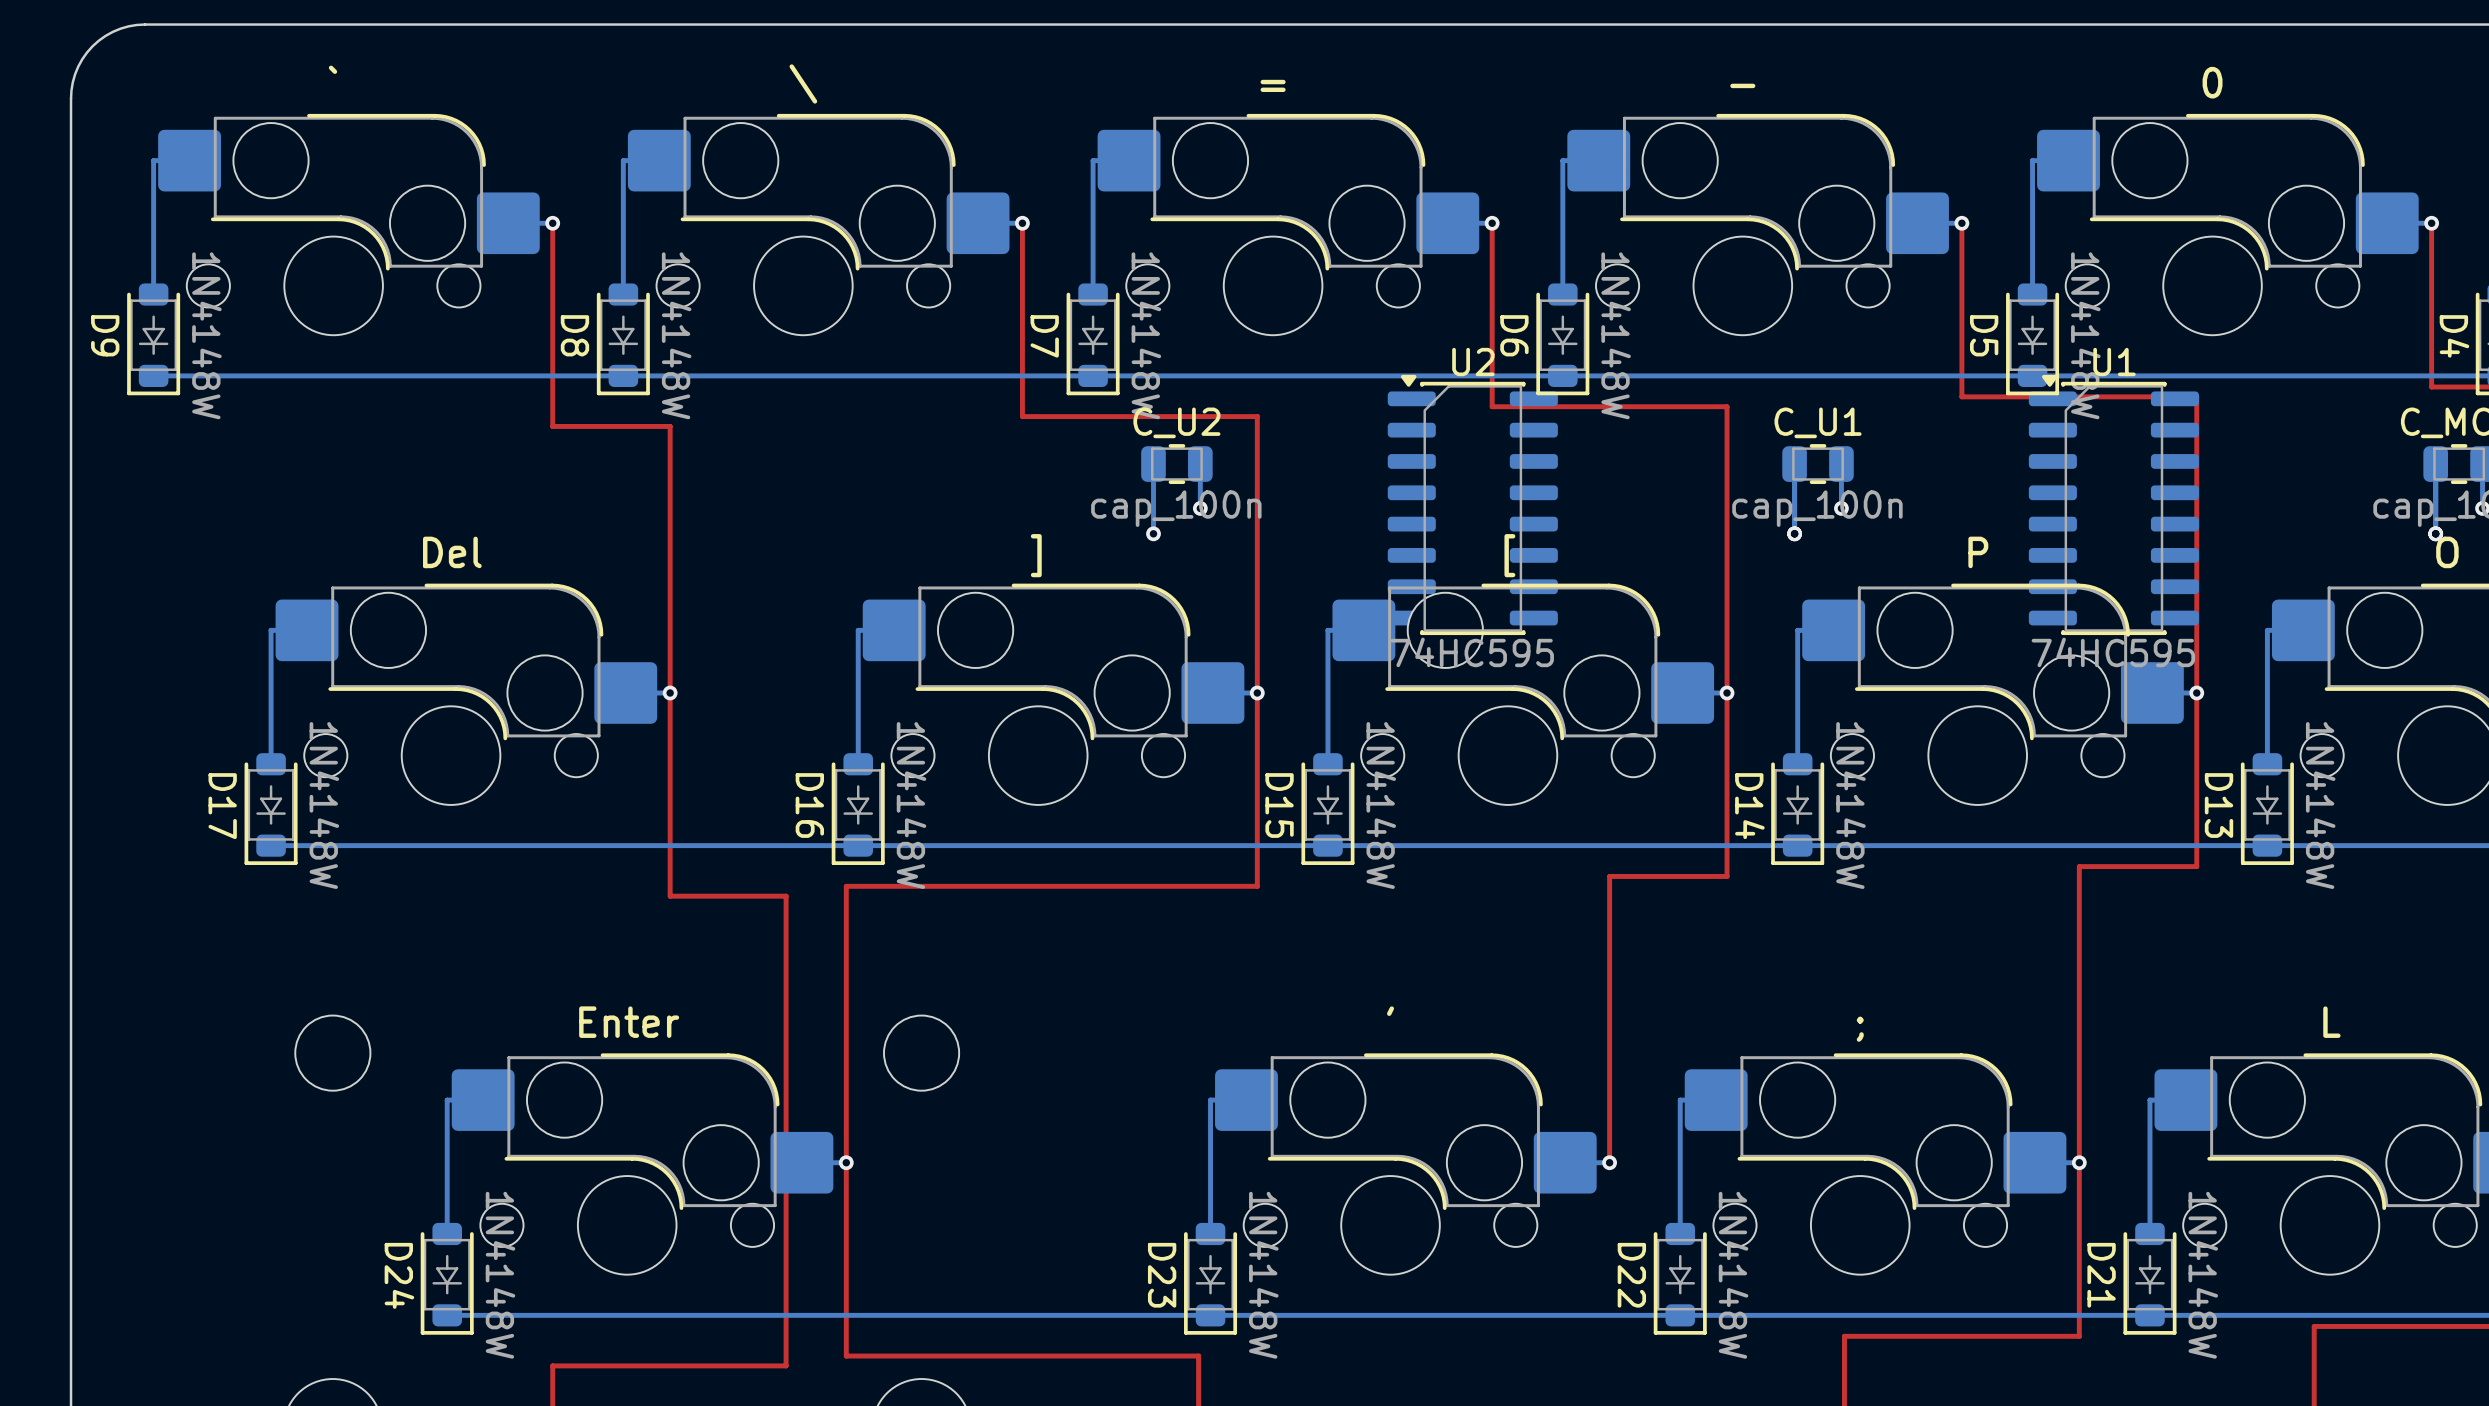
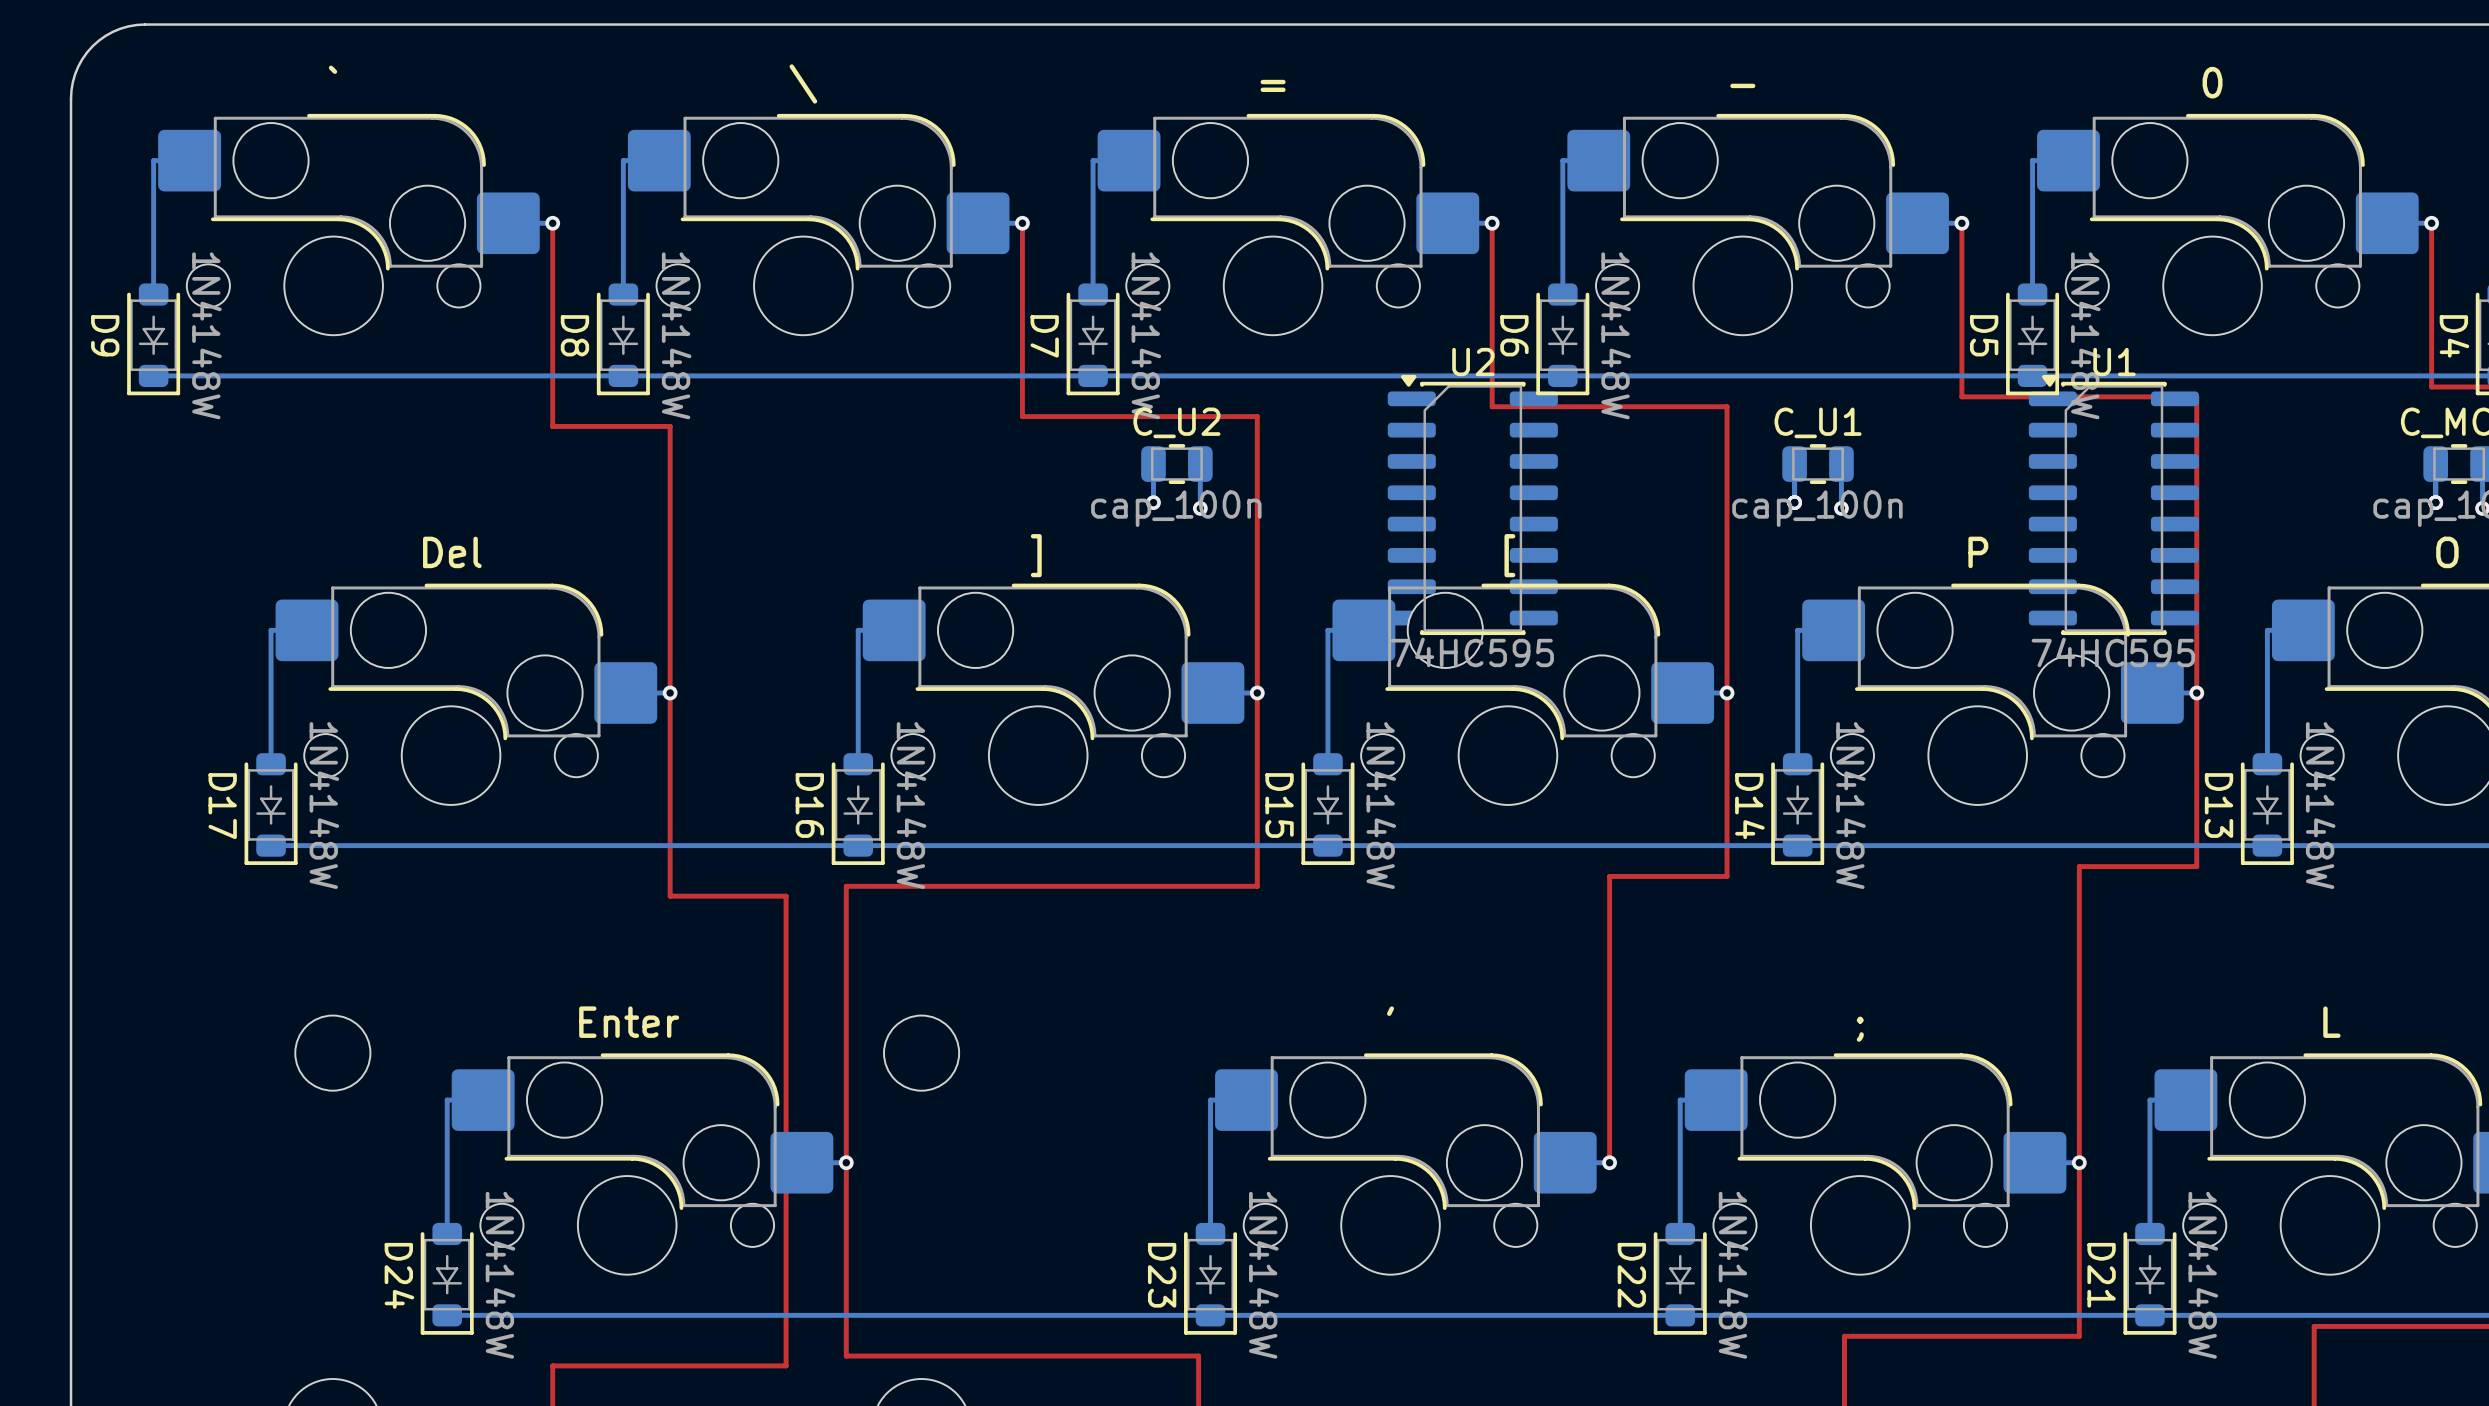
bottom track: (1153, 502) (1153, 533) -> none
bottom track: (1794, 502) (1794, 533) -> none
bottom track: (2435, 502) (2435, 533) -> none
via position: (1153, 533) -> (1153, 502)
via position: (1794, 533) -> (1794, 502)
via position: (2435, 533) -> (2435, 502)

